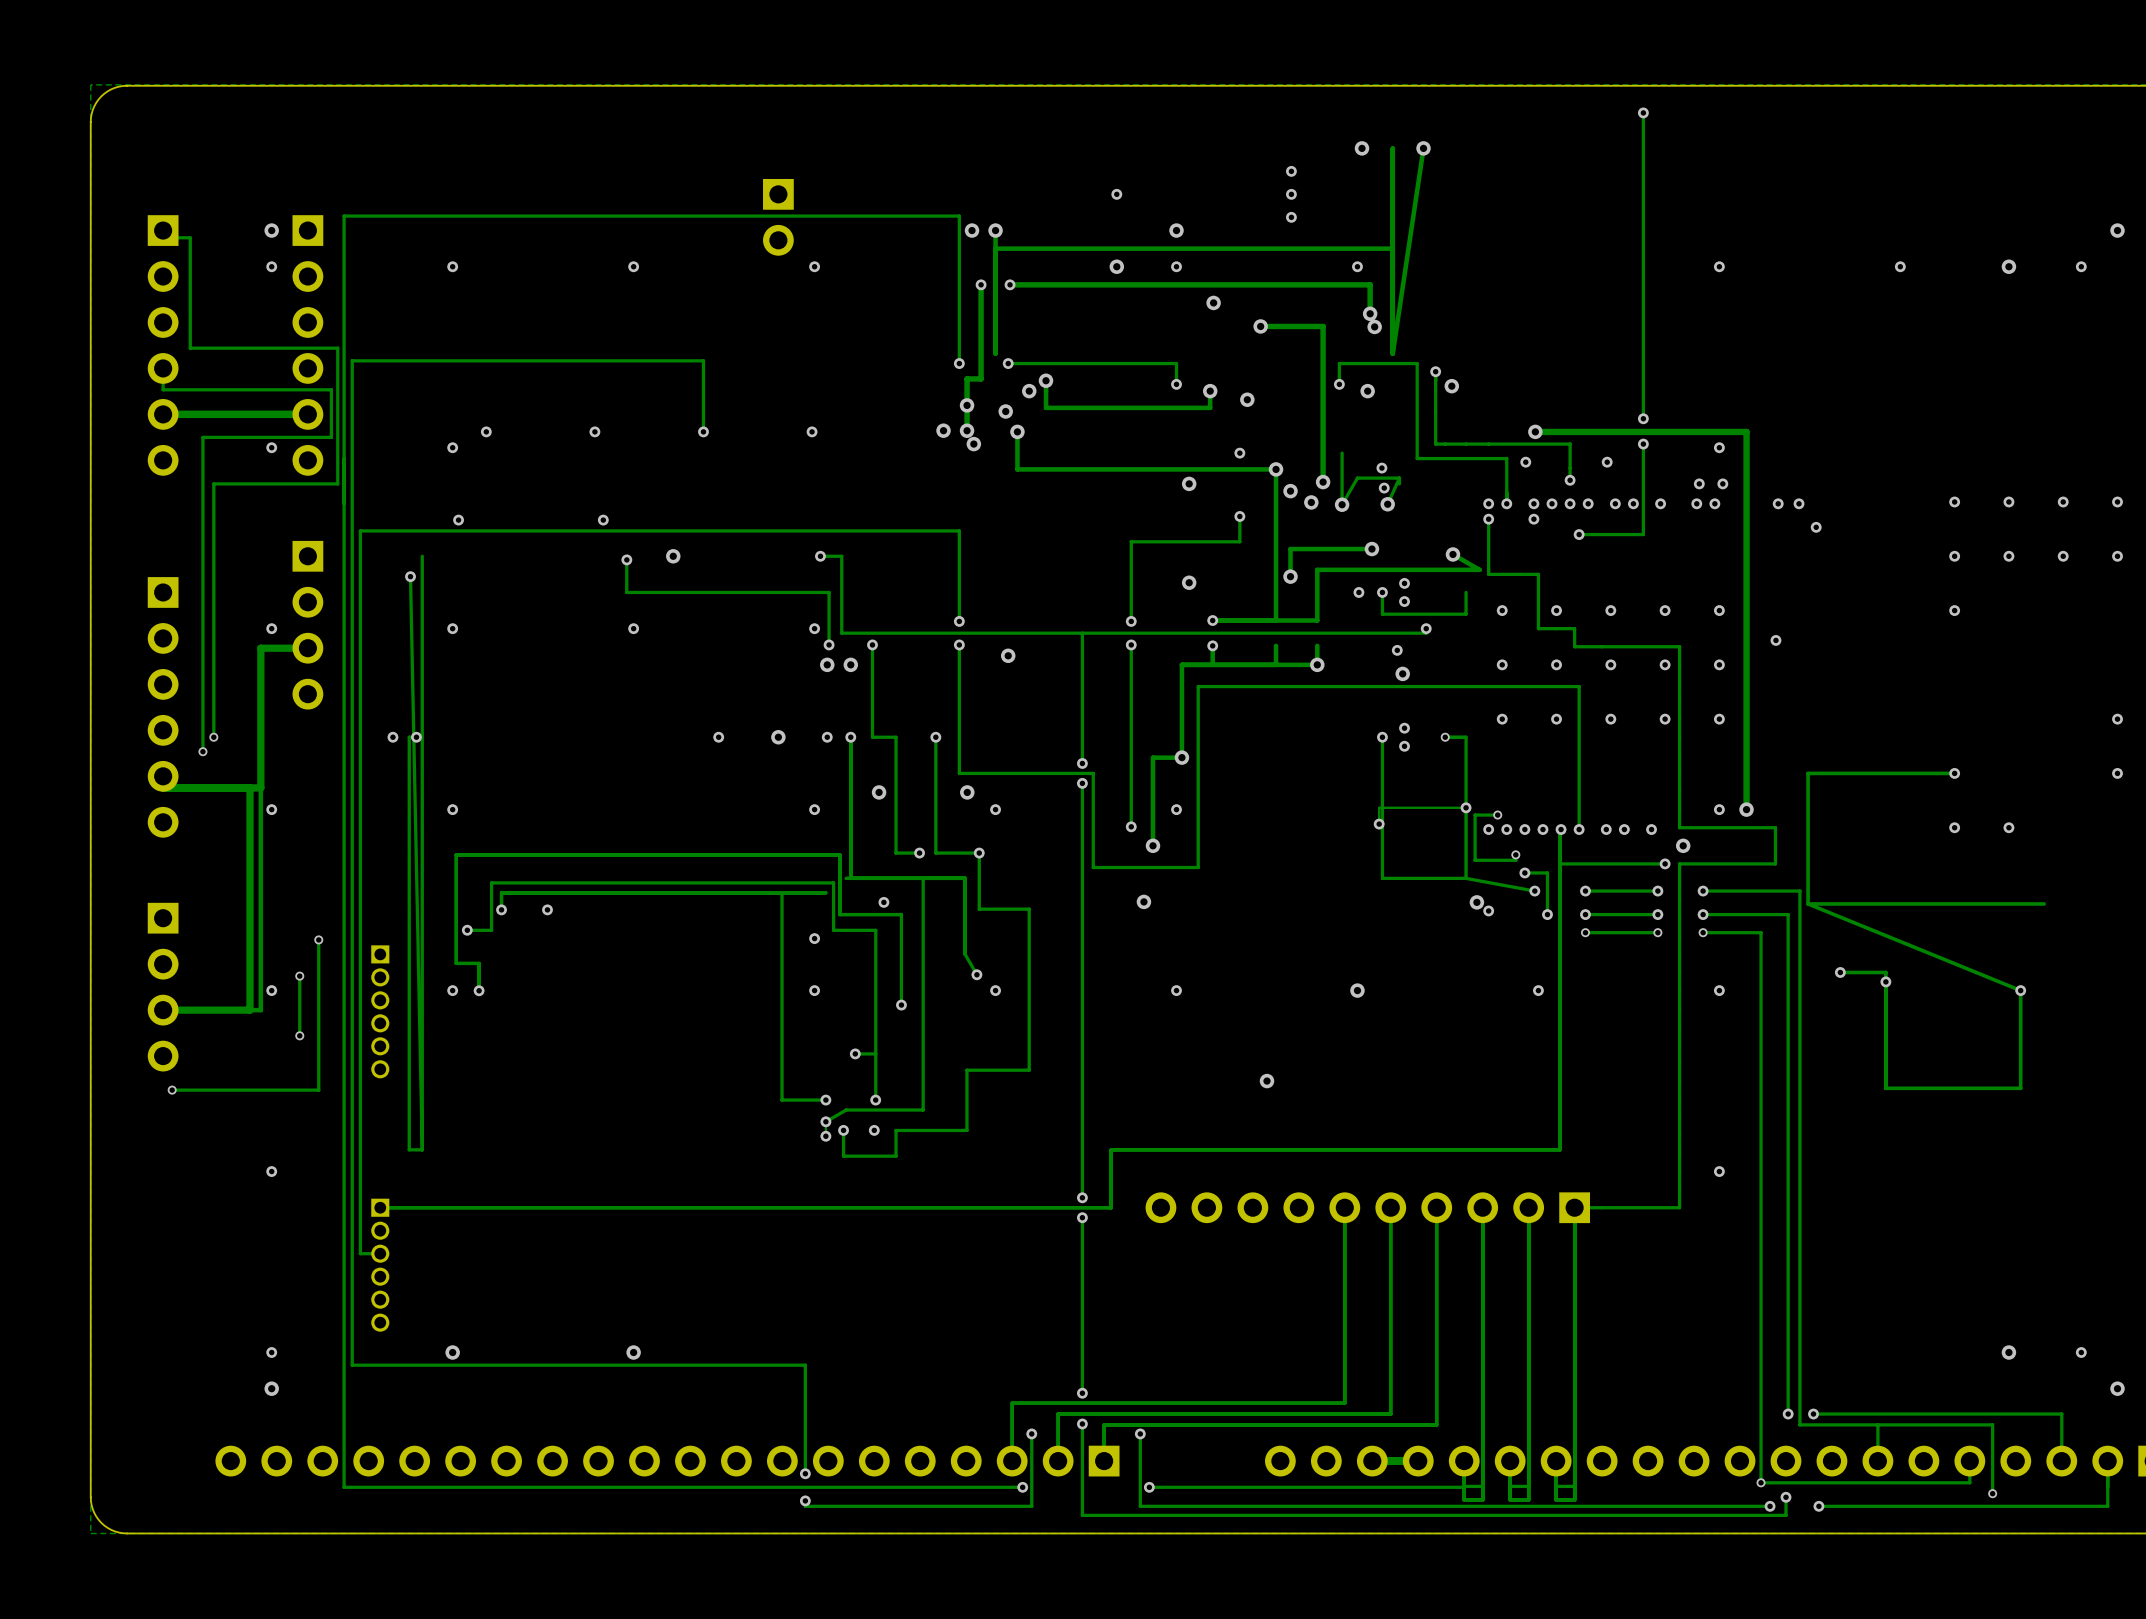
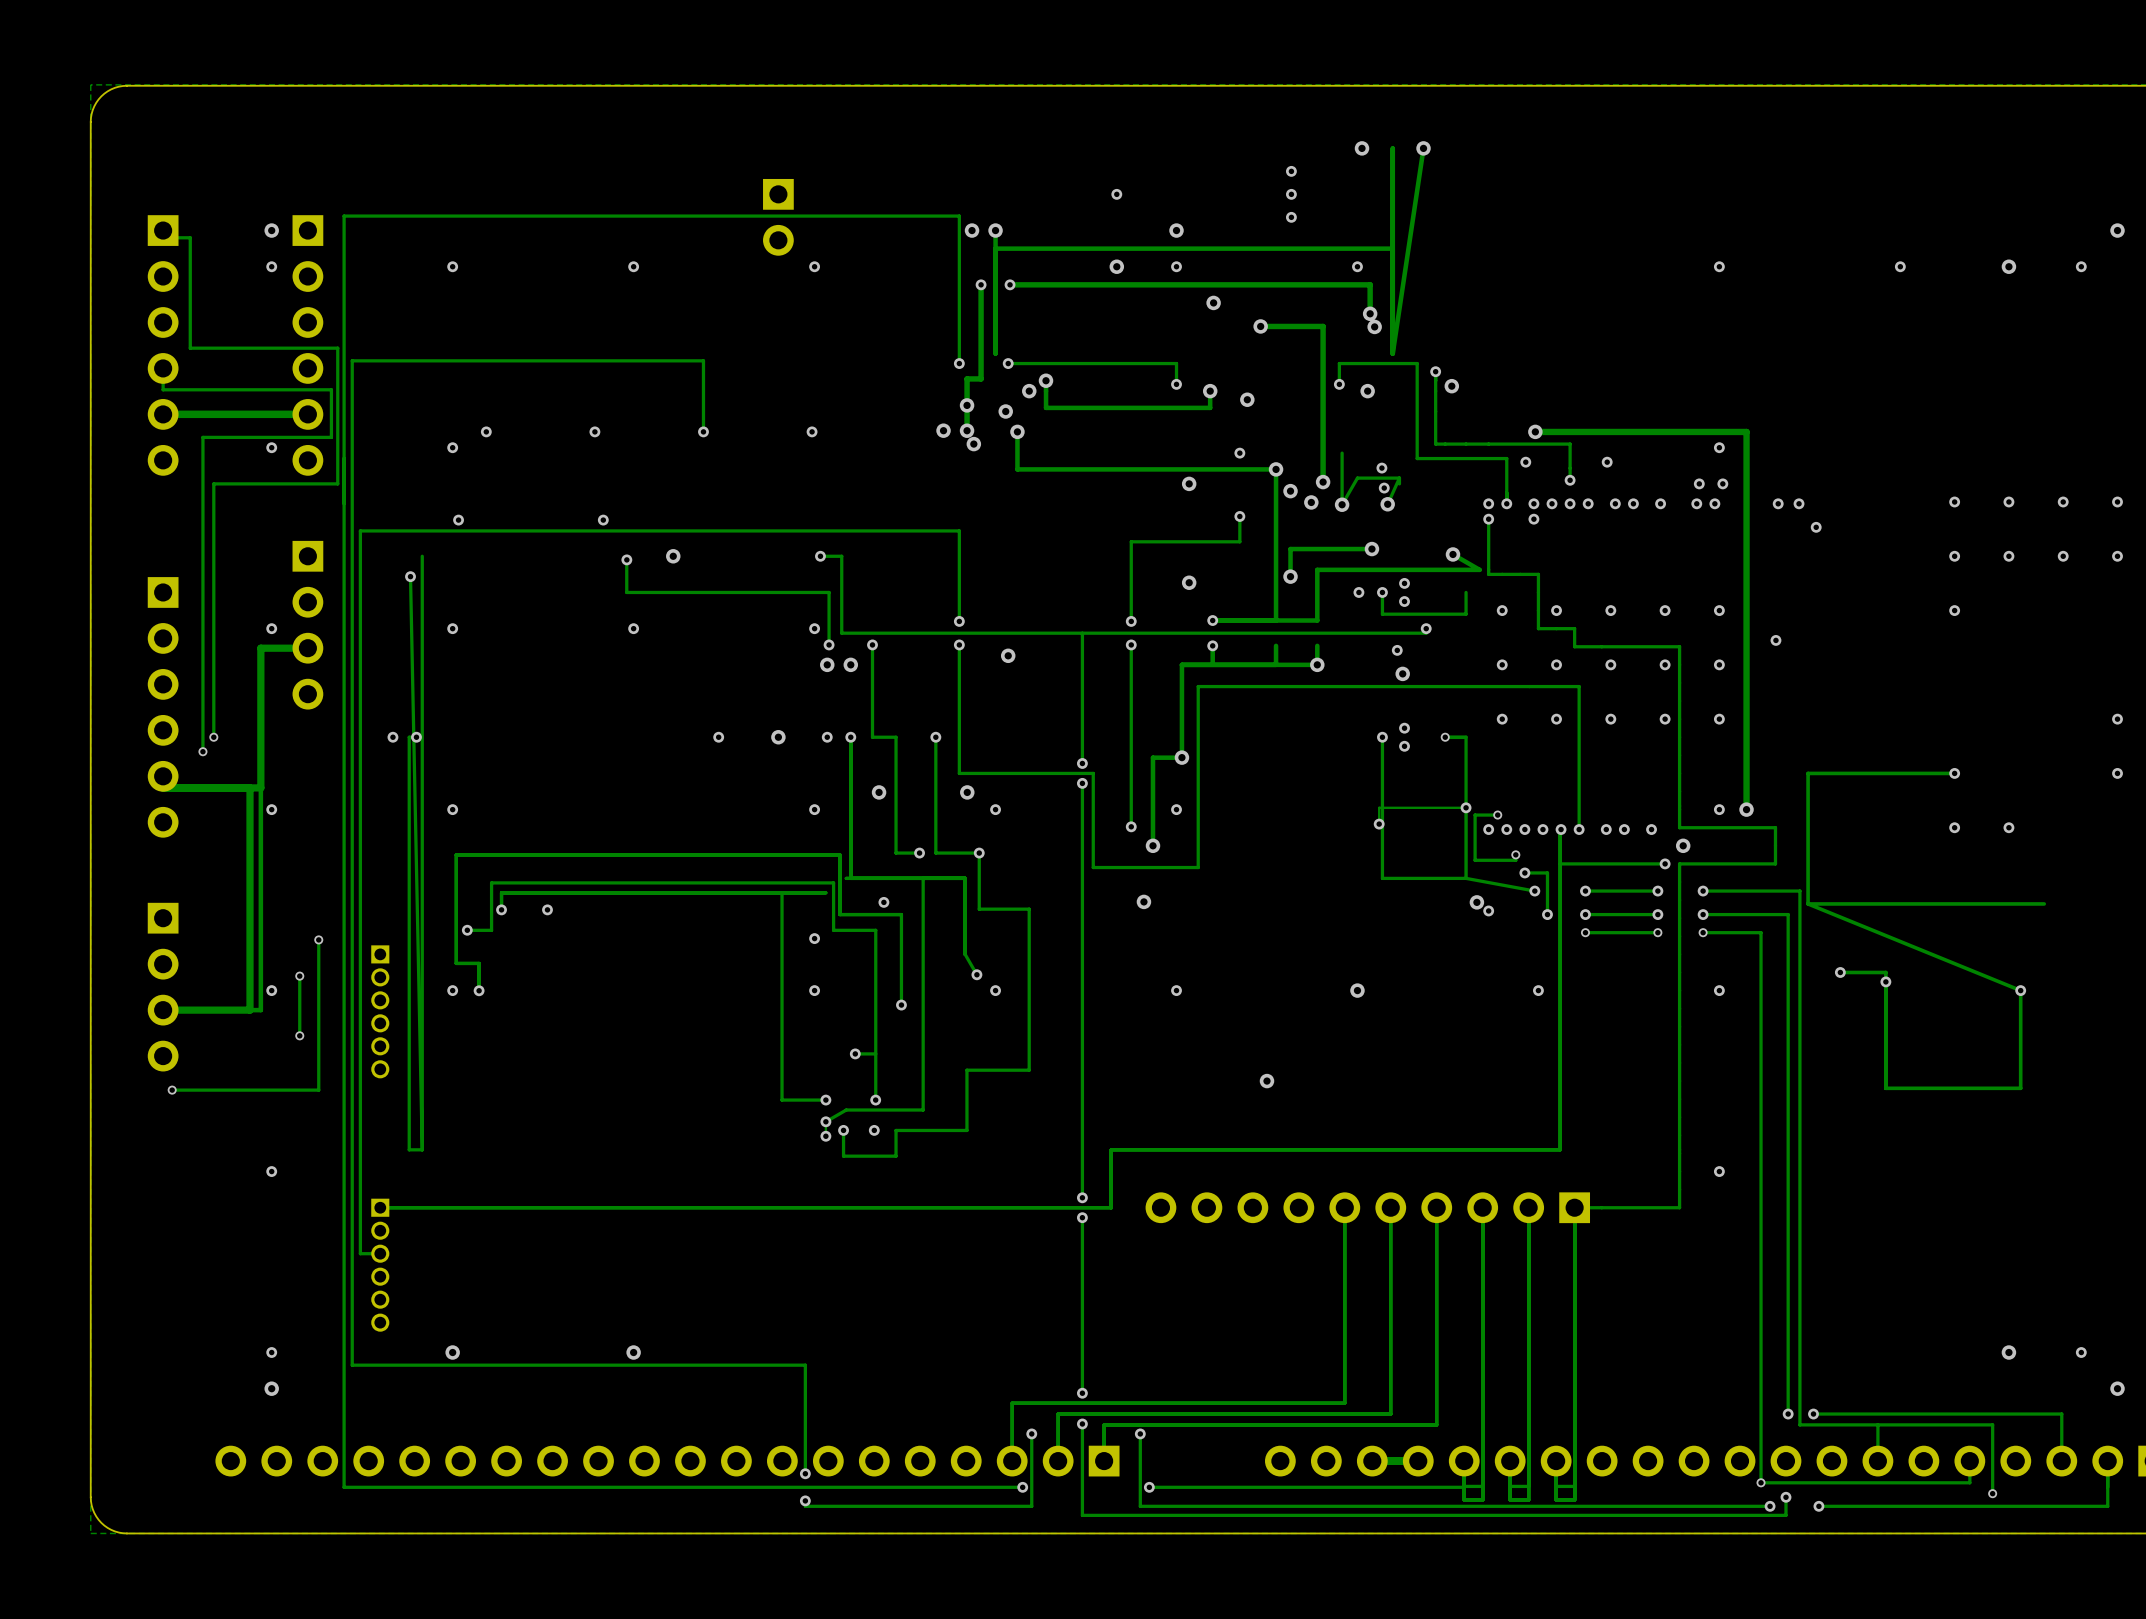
track: (1643, 112) (1643, 418) -> none
via: (1643, 112) -> none
via: (1643, 418) -> none
track: (1643, 444) (1643, 534) (1579, 534) -> none
via: (1643, 444) -> none
via: (1579, 534) -> none

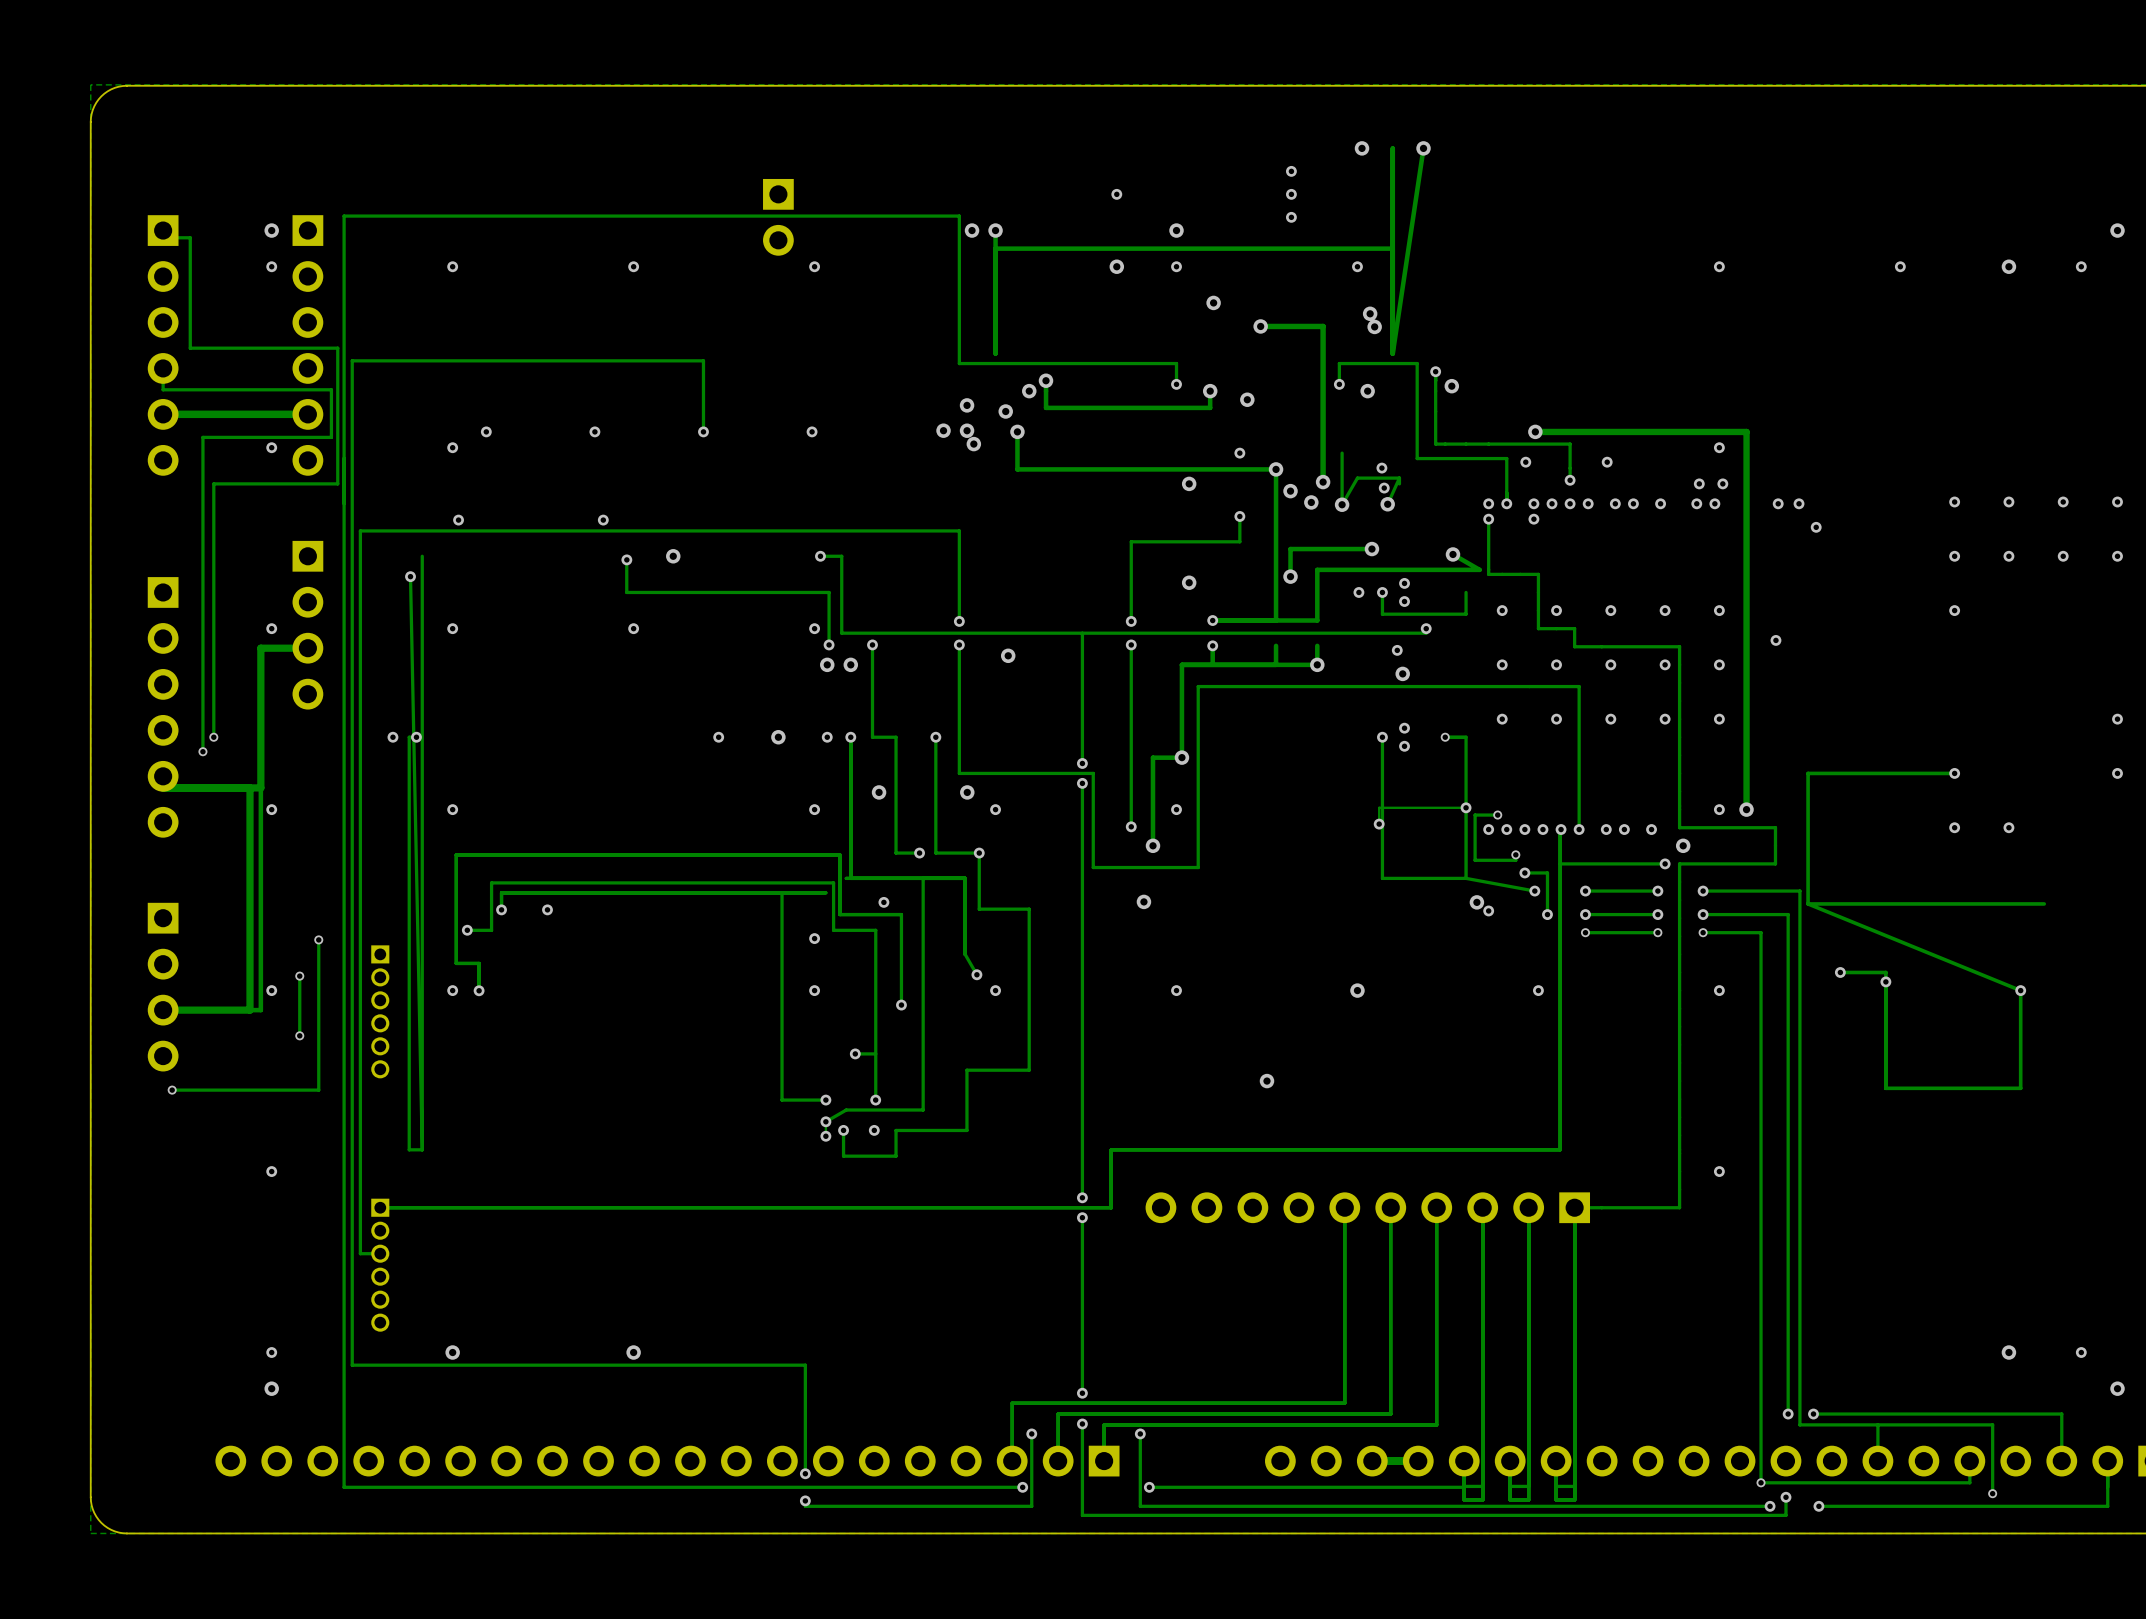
track: (981, 284) (981, 378) (967, 378) (967, 430) -> none
via: (981, 284) -> none
track: (1010, 284) (1370, 284) (1370, 313) -> none
via: (1010, 284) -> none
via: (959, 363) -> none
track: none -> (1008, 363) (959, 363)
via: (1008, 363) -> none

